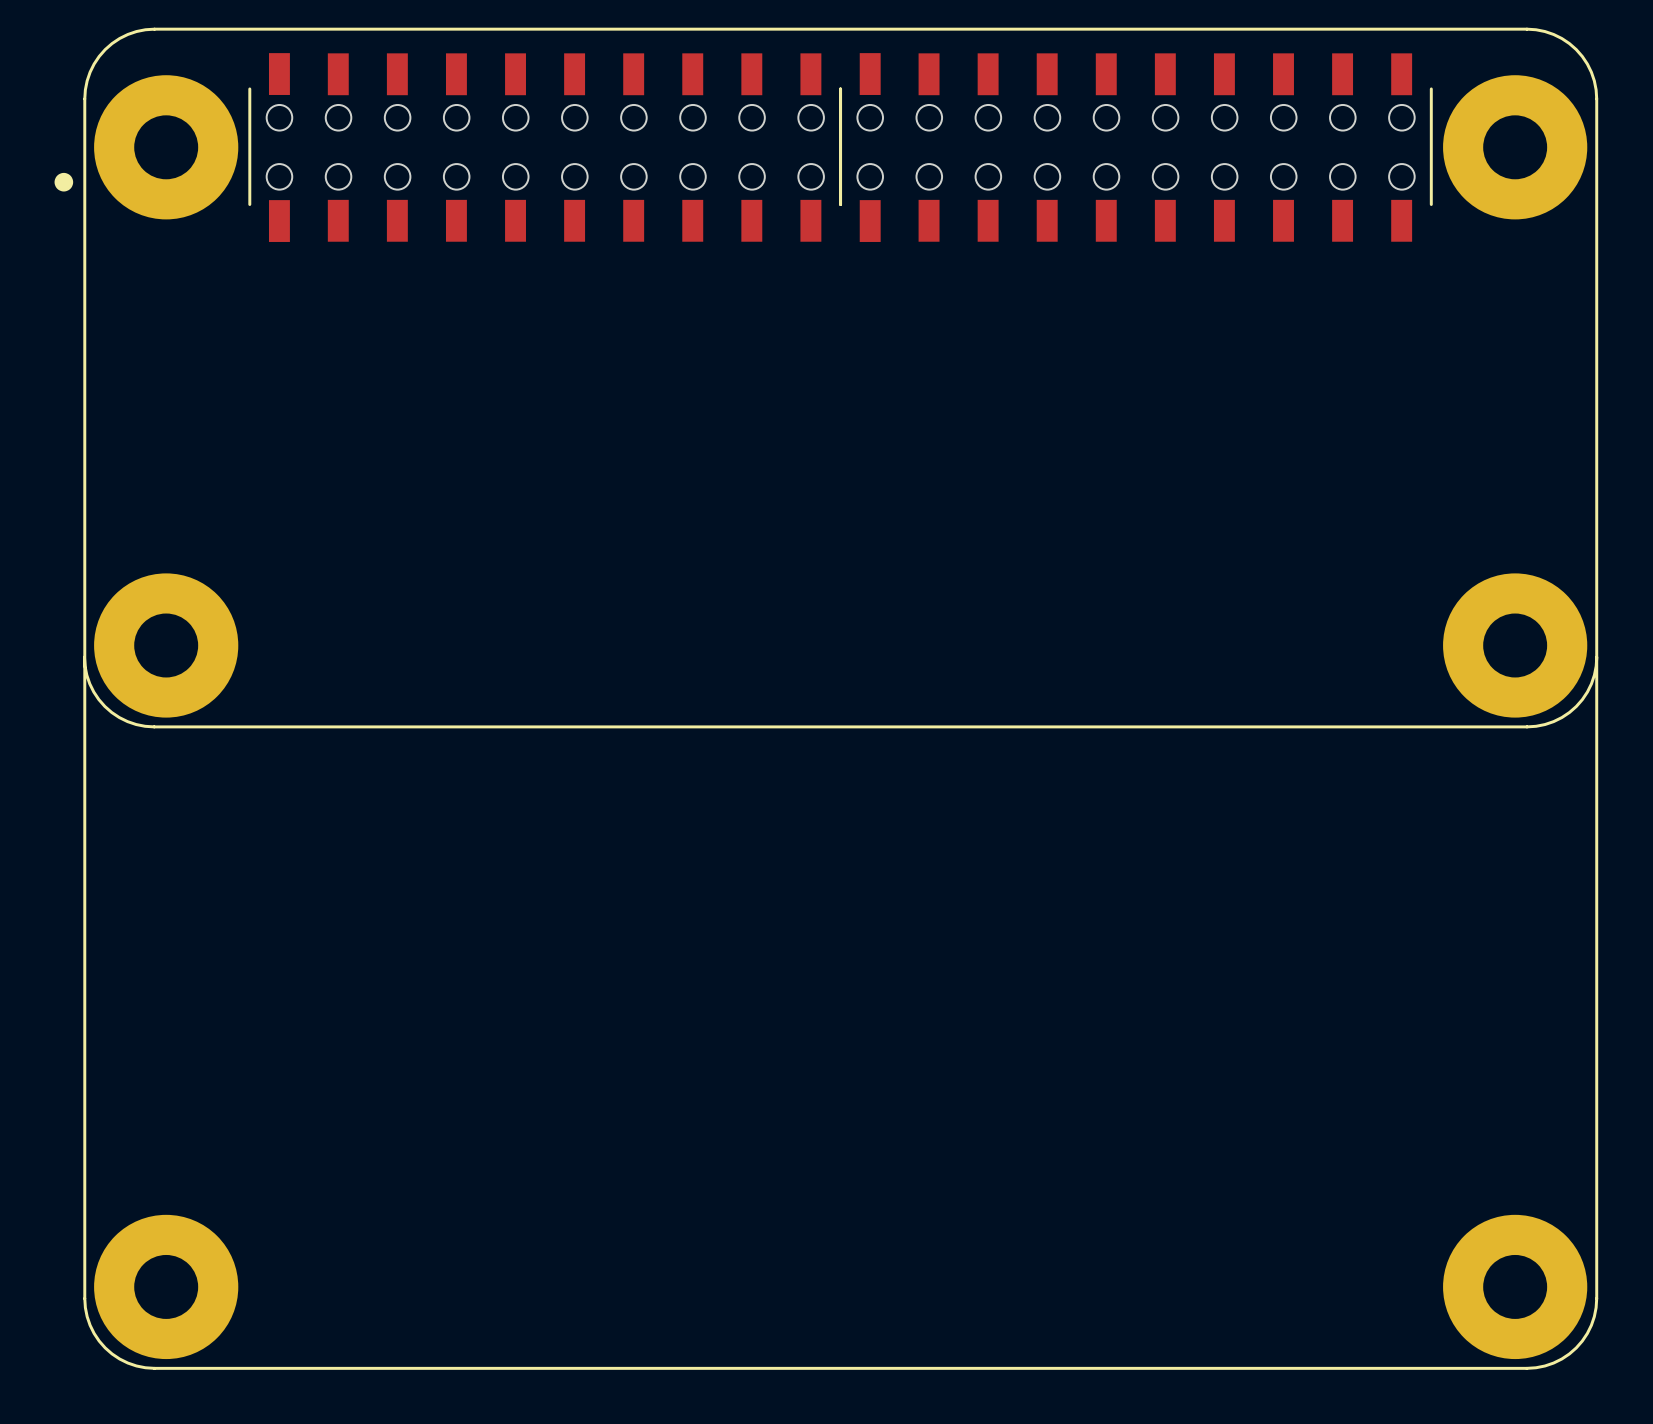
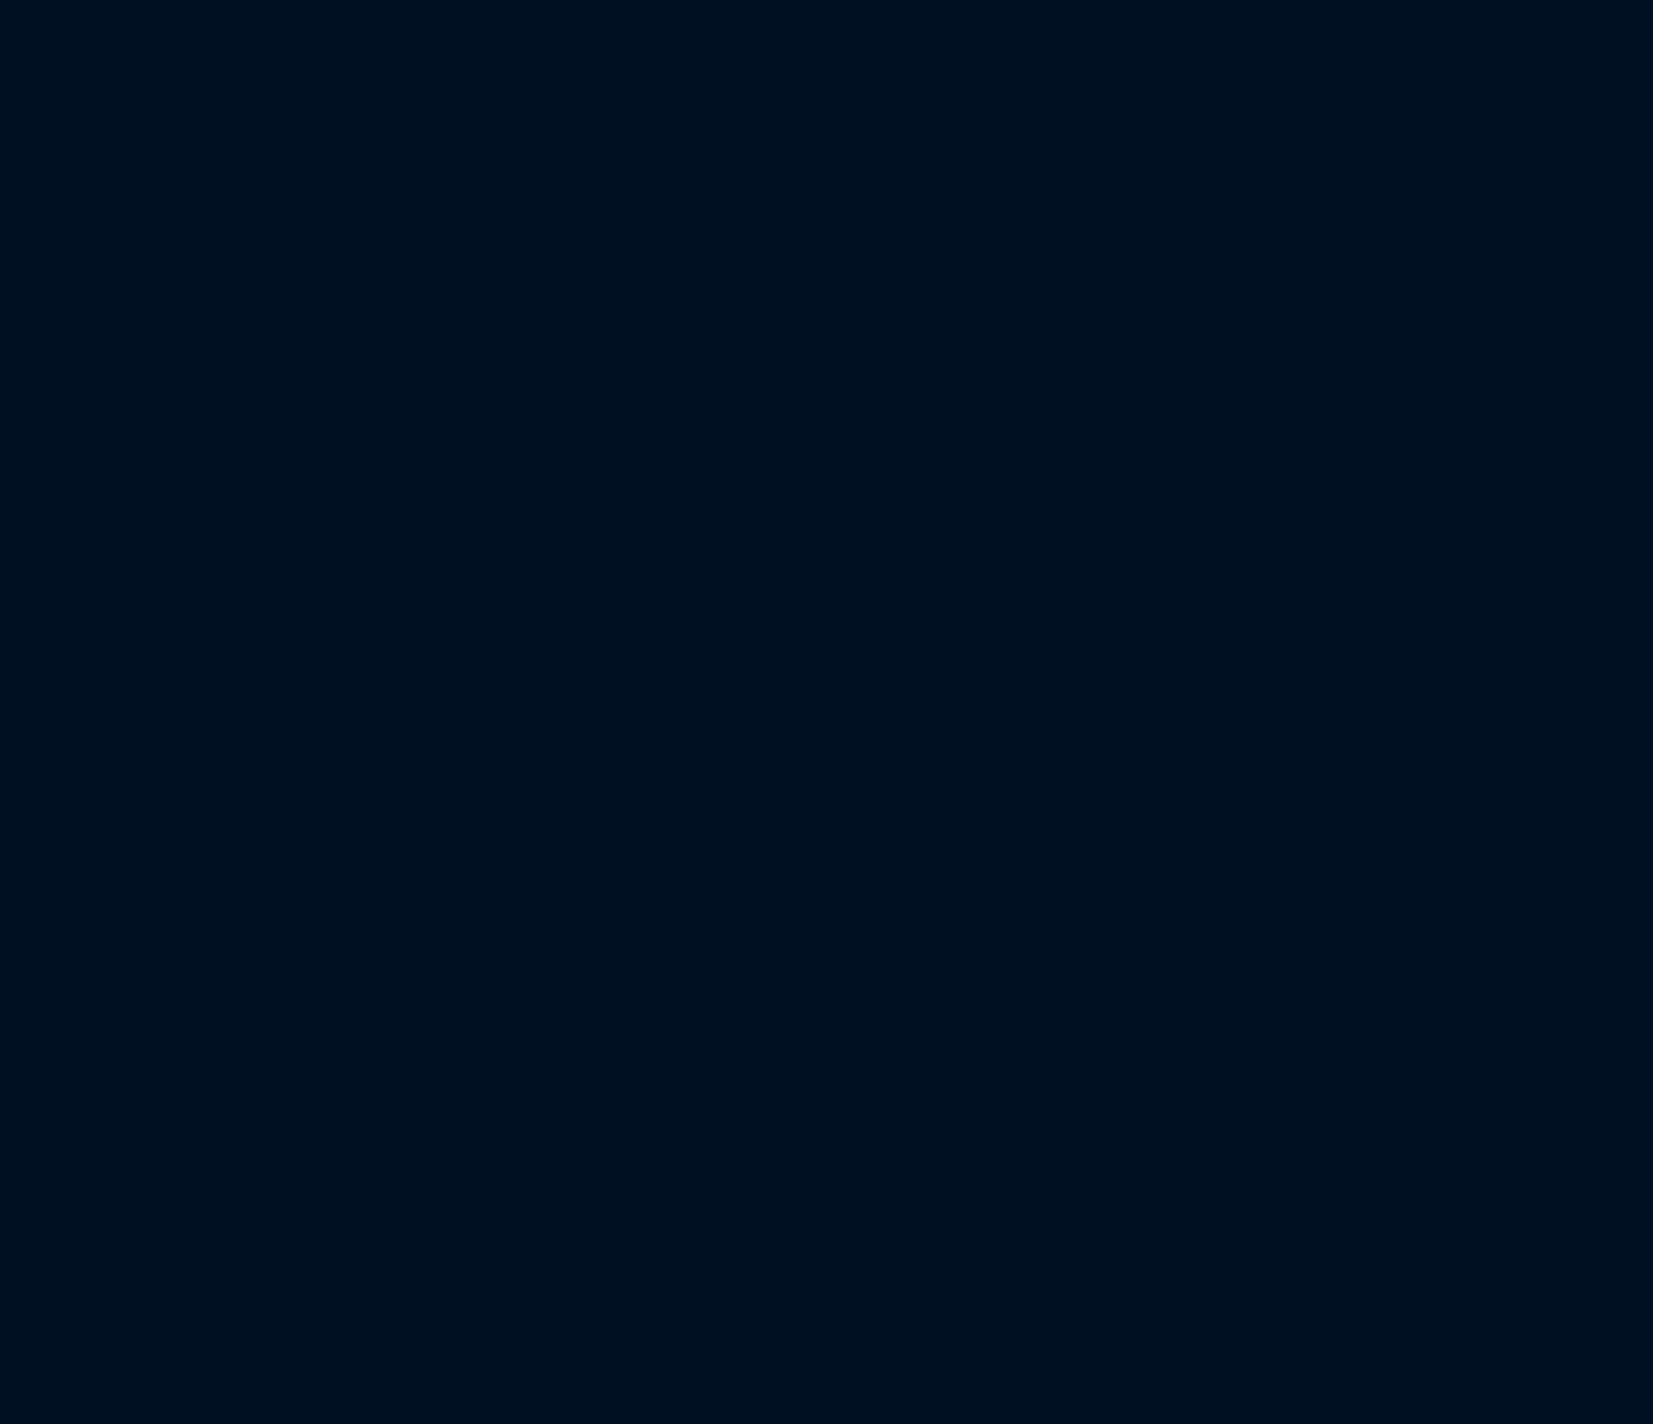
part: (826, 698) -> none

